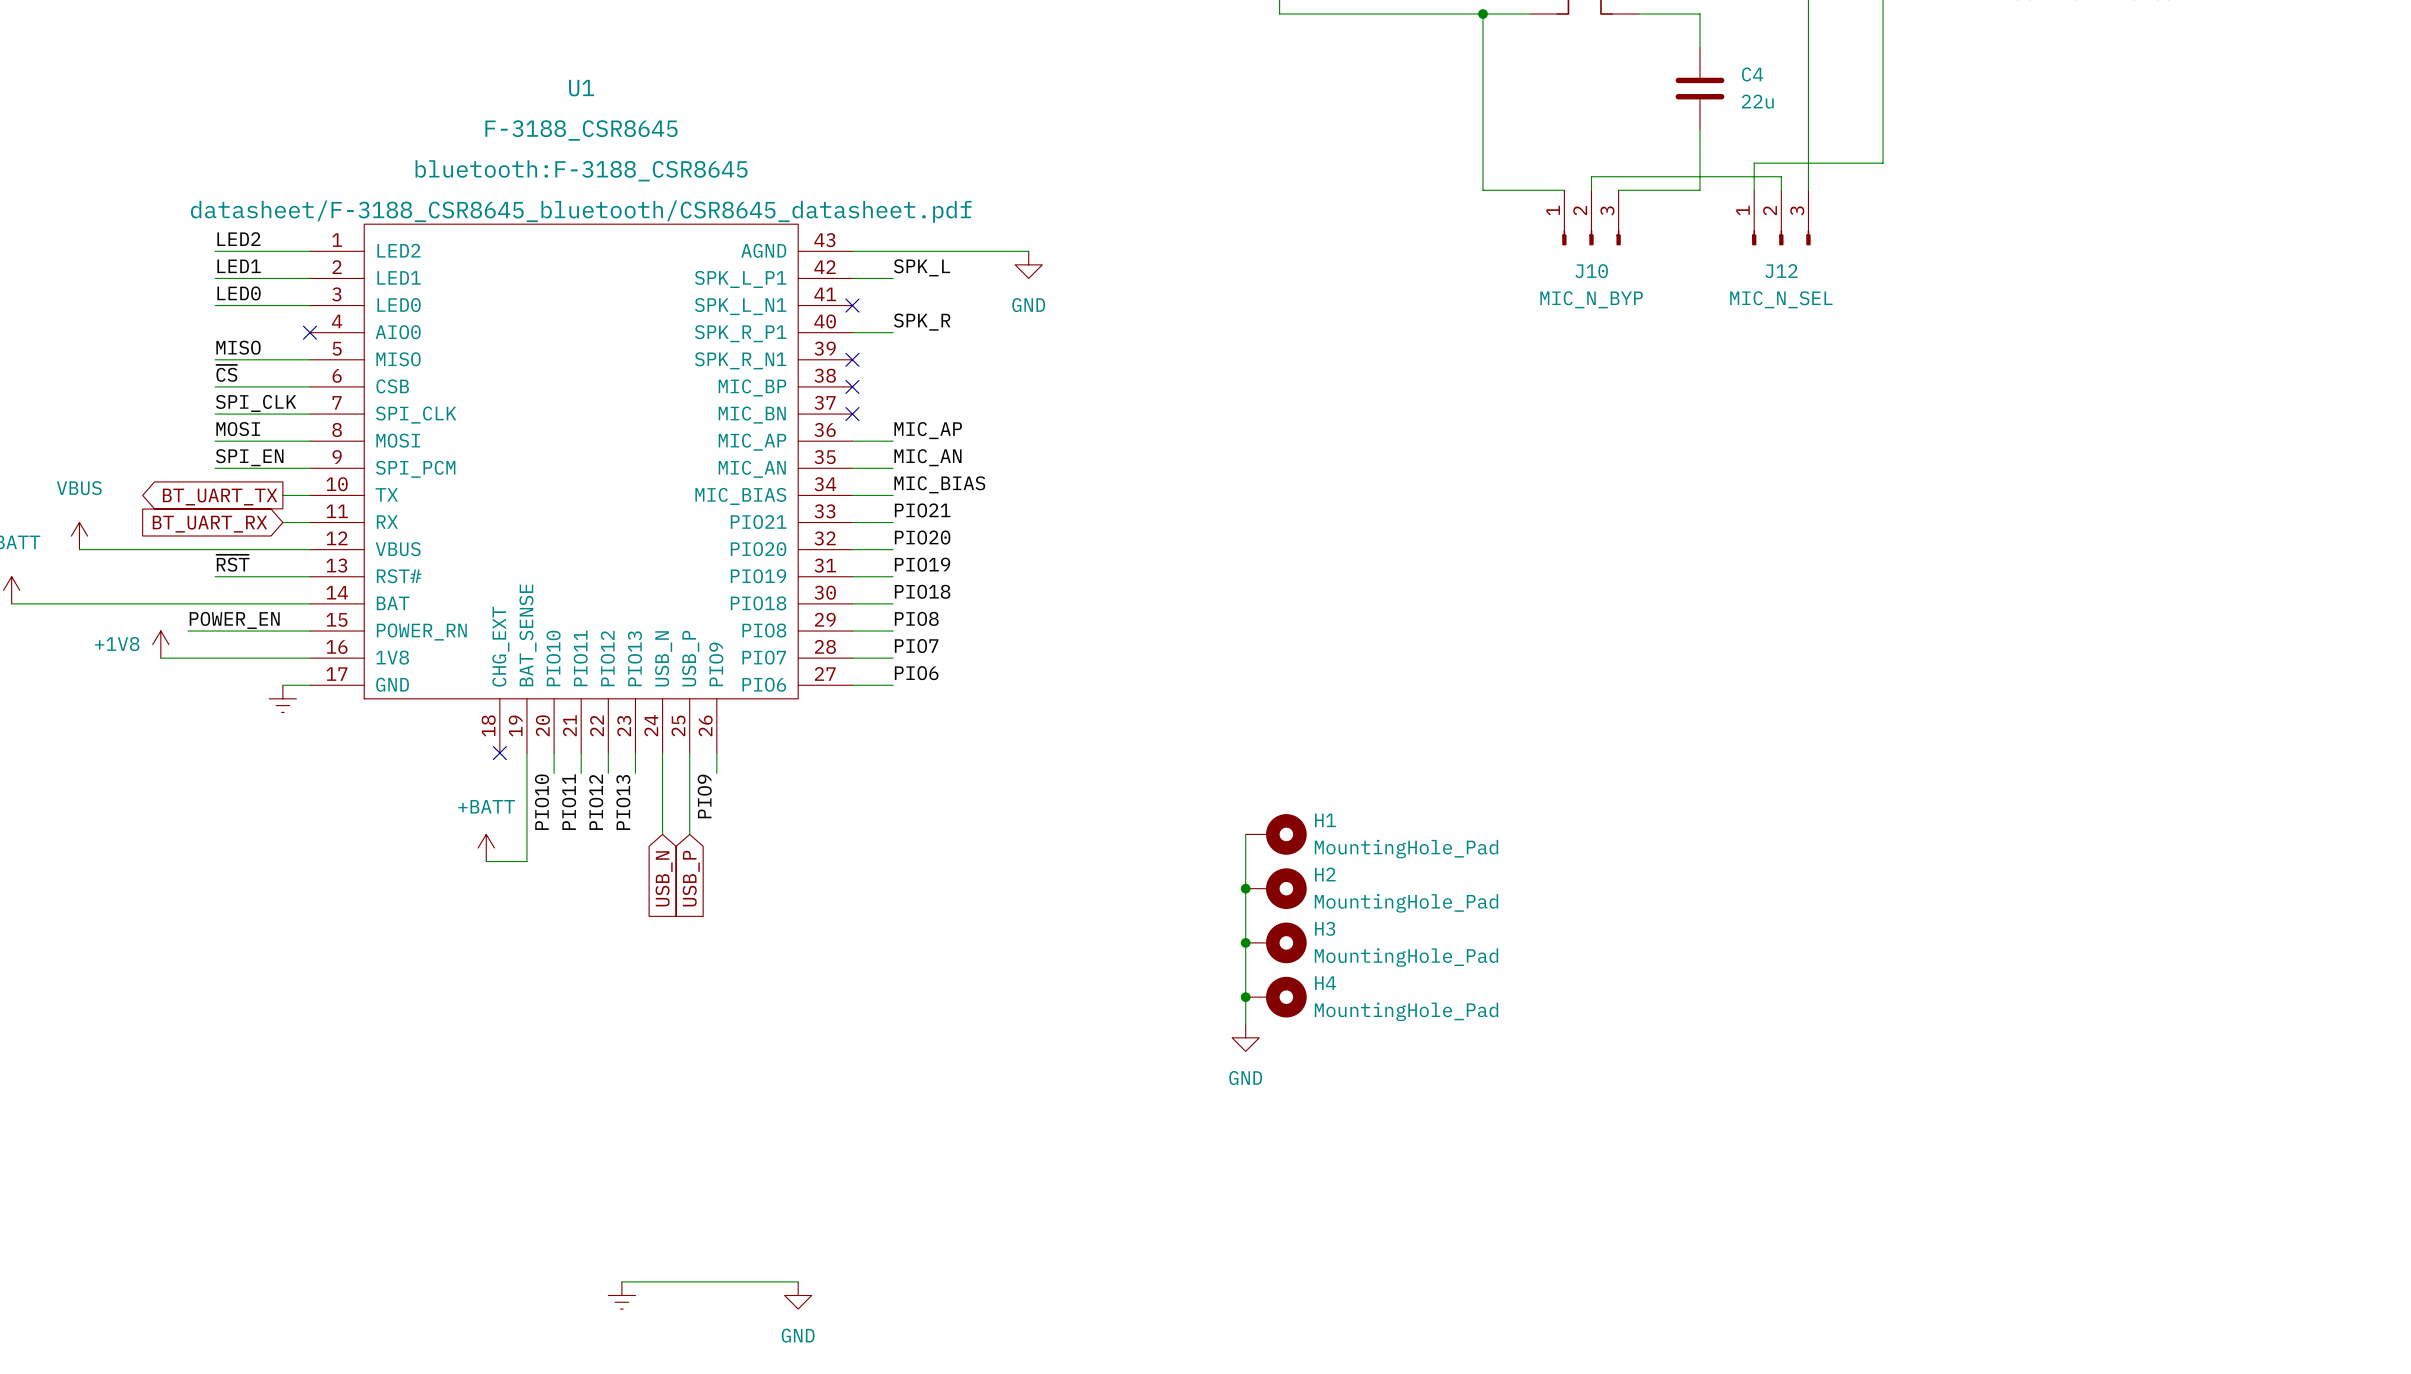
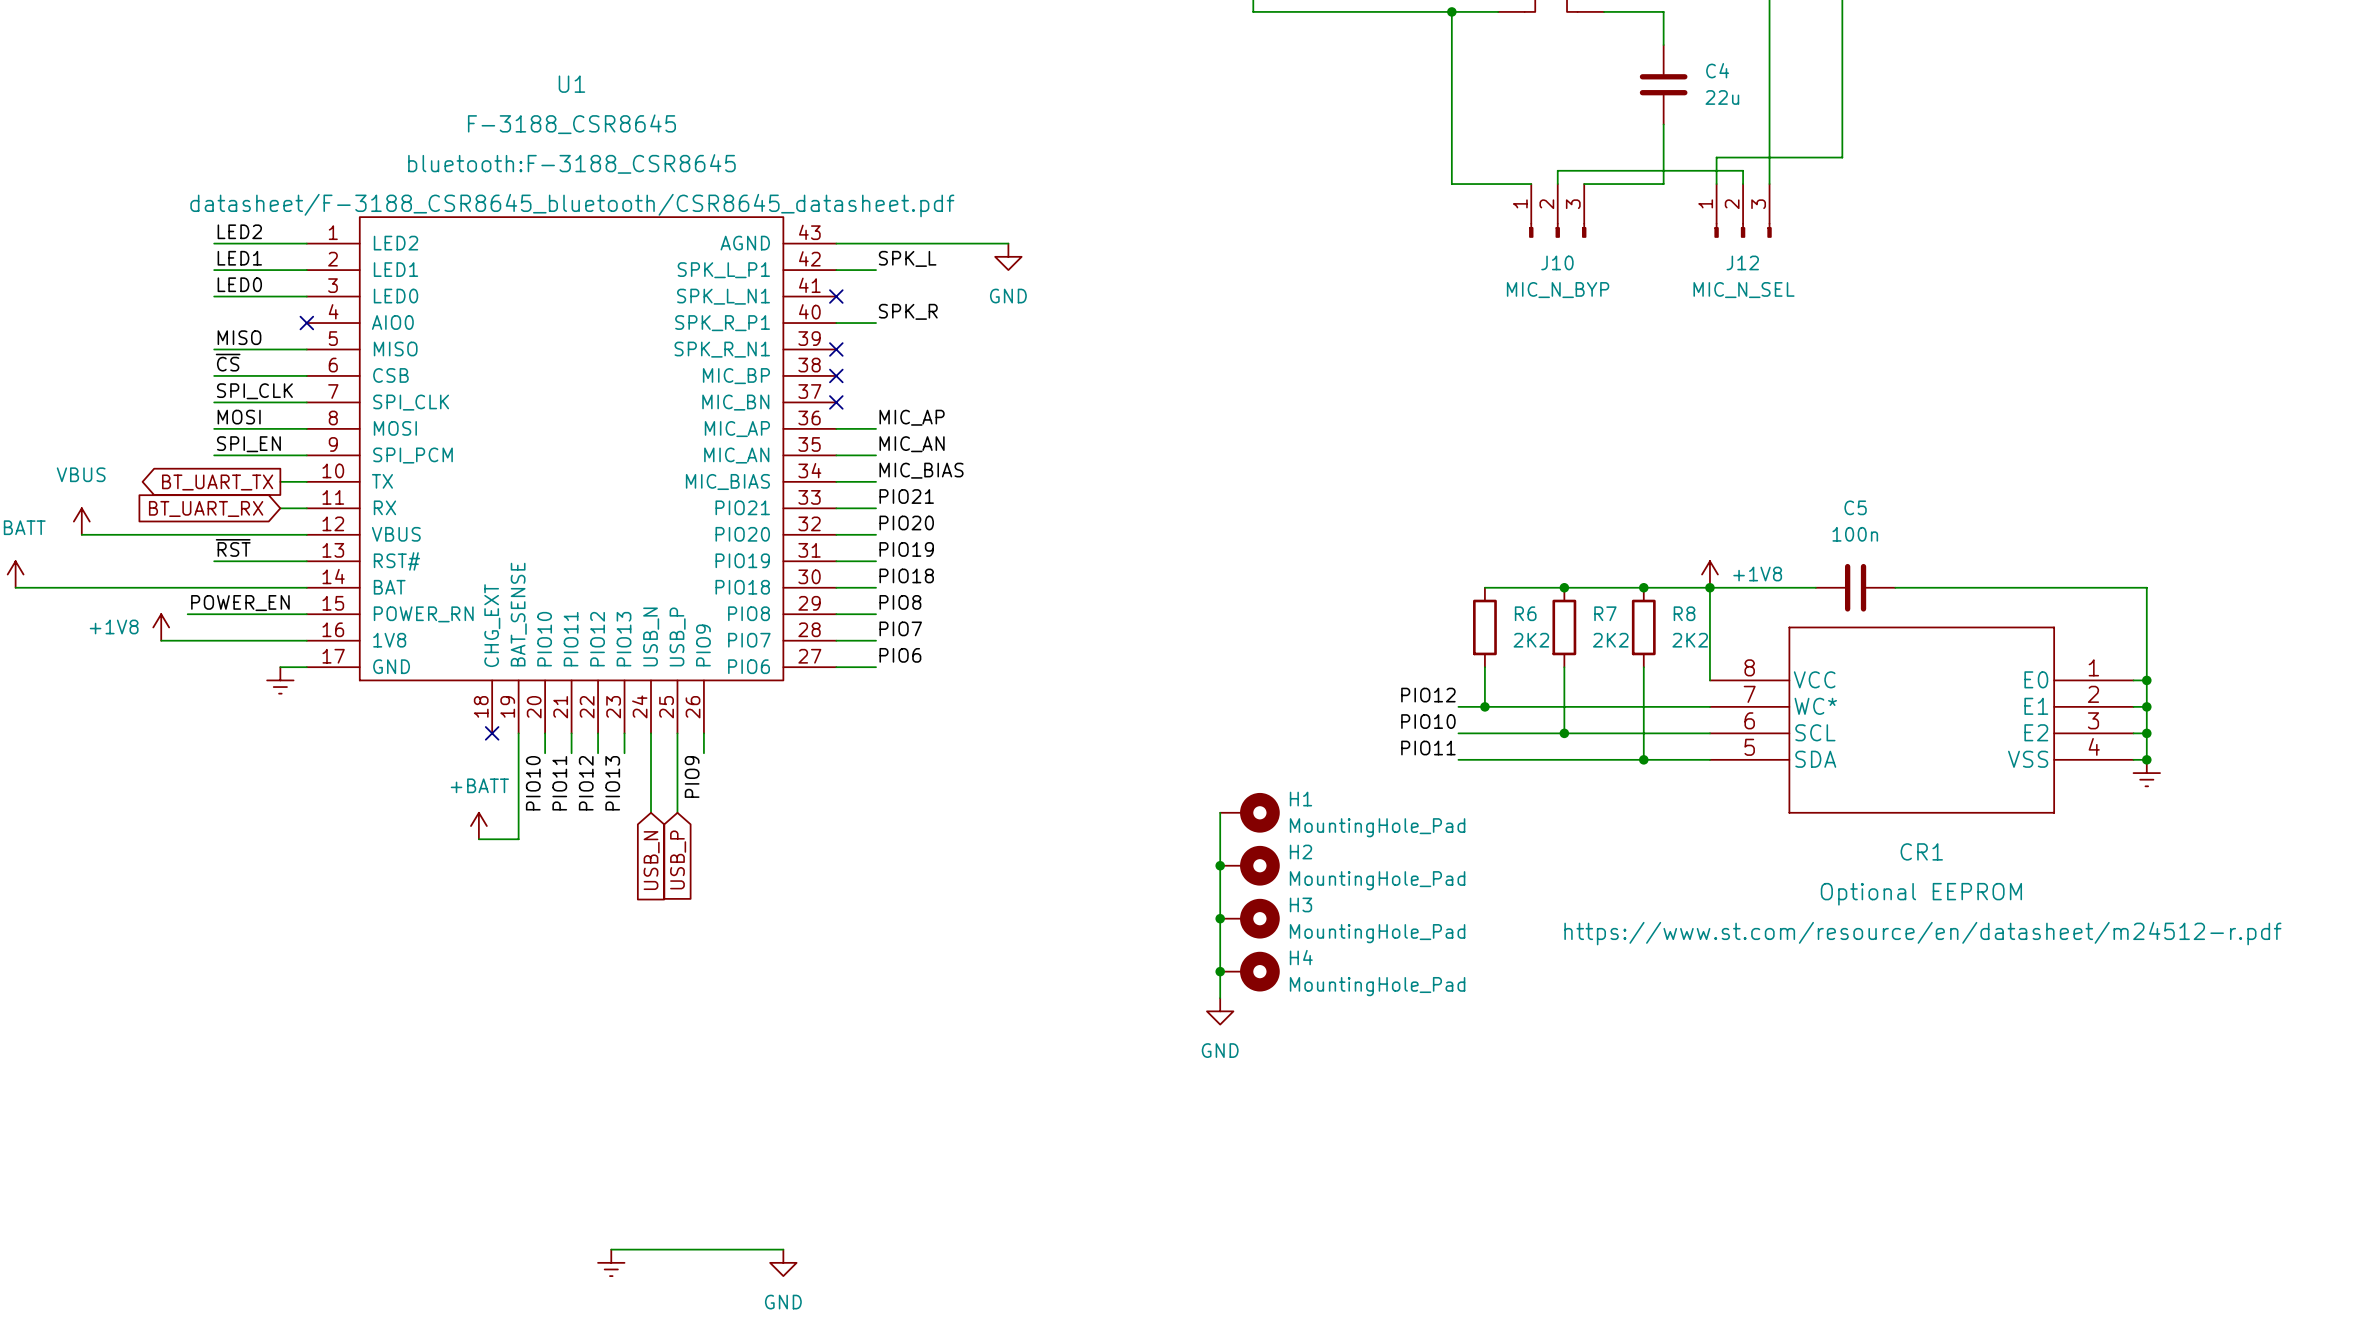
power symbol: none -> +1V8 (1709, 574)
wire: none -> (1484, 587) (1815, 587)
junction: none -> (1564, 587)
junction: none -> (1643, 587)
wire: none -> (1709, 587) (1709, 680)
junction: none -> (1709, 587)
C5: none -> 100n (1855, 587)
wire: none -> (1895, 587) (2146, 587) (2146, 759) (2133, 759)
R6: none -> 2K2 (1484, 627)
R7: none -> 2K2 (1564, 627)
R8: none -> 2K2 (1643, 627)
wire: none -> (1484, 667) (1484, 706)
wire: none -> (1564, 667) (1564, 733)
wire: none -> (1643, 667) (1643, 759)
wire: none -> (2133, 680) (2146, 680)
junction: none -> (2146, 680)
label: none -> PIO12 (1428, 695)
wire: none -> (1458, 706) (1709, 706)
junction: none -> (1484, 706)
wire: none -> (2133, 706) (2146, 706)
junction: none -> (2146, 706)
CR1: none -> Optional EEPROM (1921, 720)
label: none -> PIO10 (1428, 721)
wire: none -> (1458, 733) (1709, 733)
junction: none -> (1564, 733)
wire: none -> (2133, 733) (2146, 733)
junction: none -> (2146, 733)
label: none -> PIO11 (1428, 748)
wire: none -> (1458, 759) (1709, 759)
junction: none -> (1643, 759)
junction: none -> (2146, 759)
power symbol: none -> (2146, 773)

